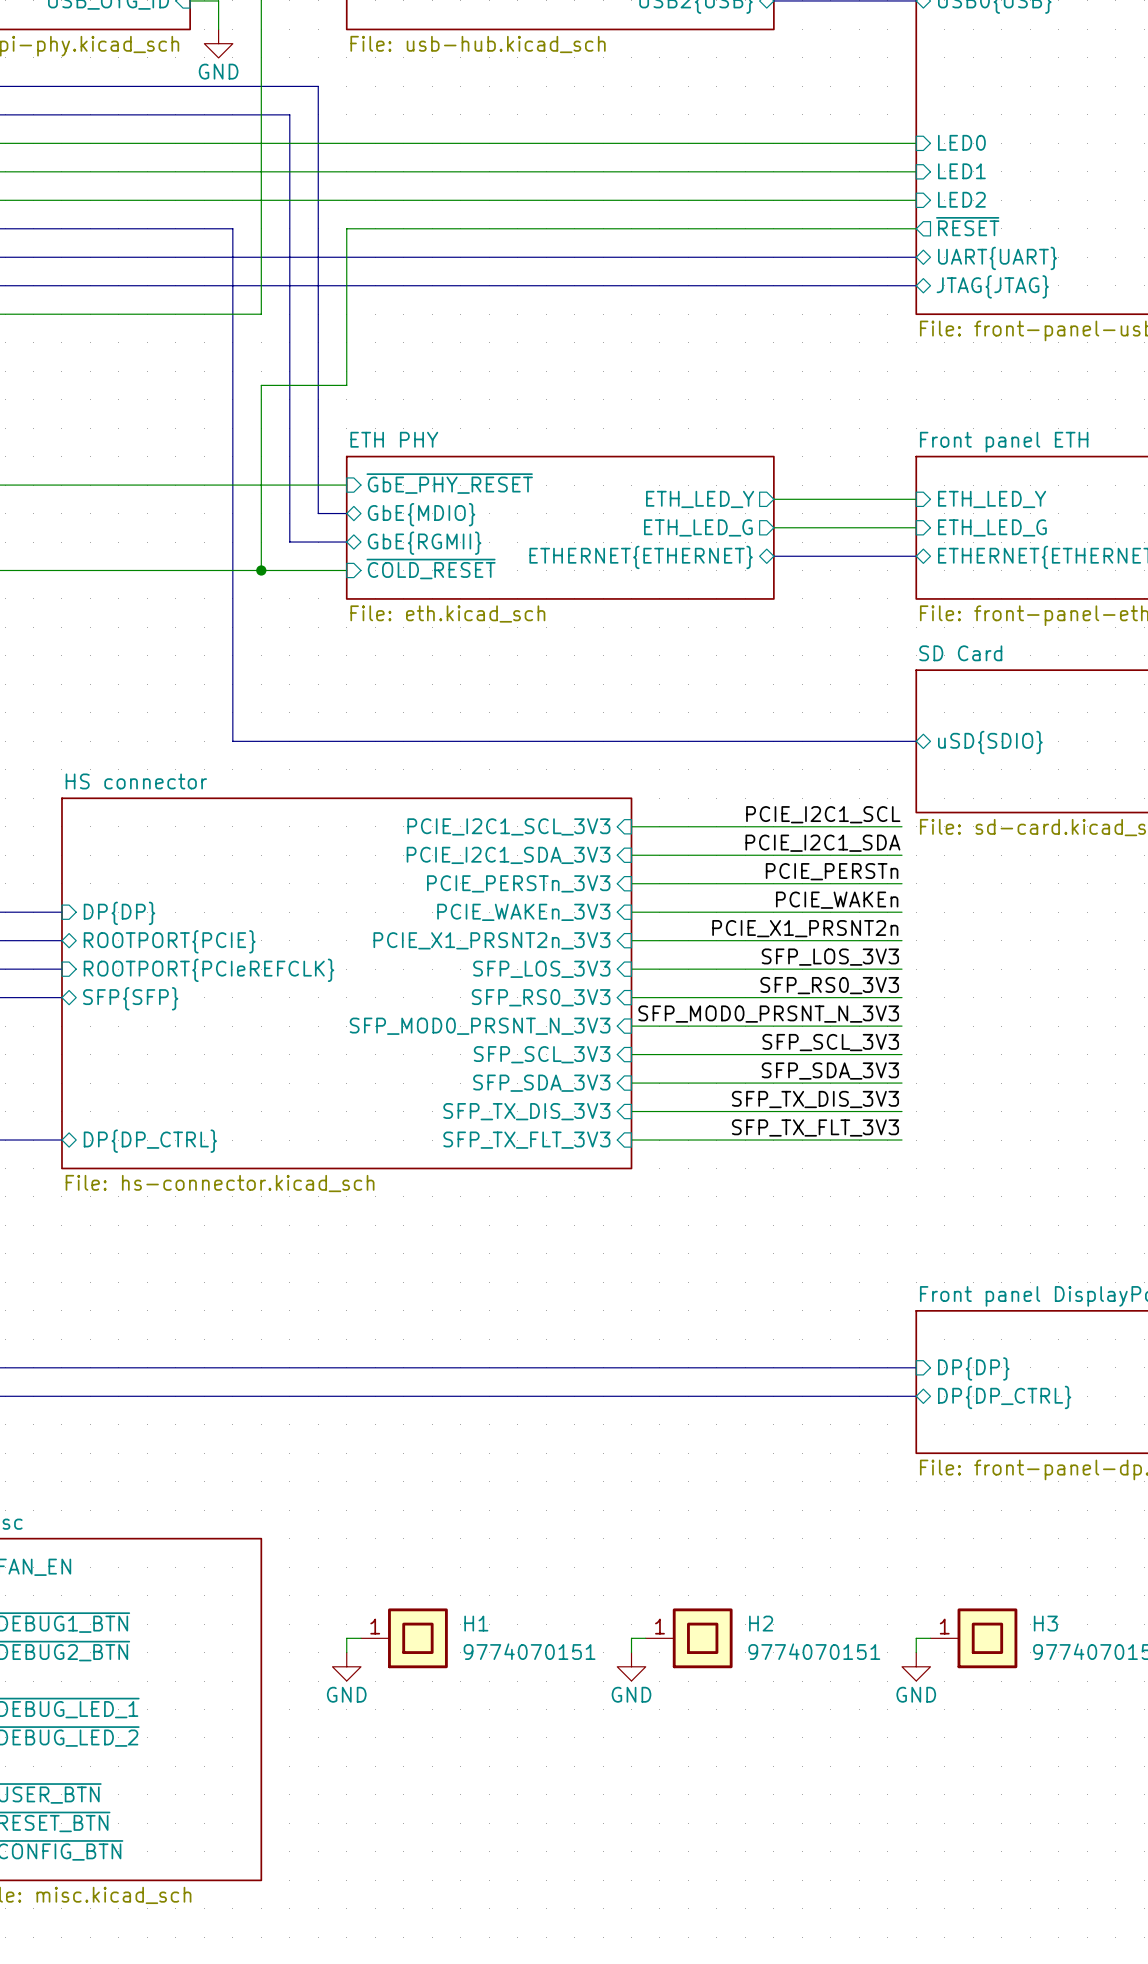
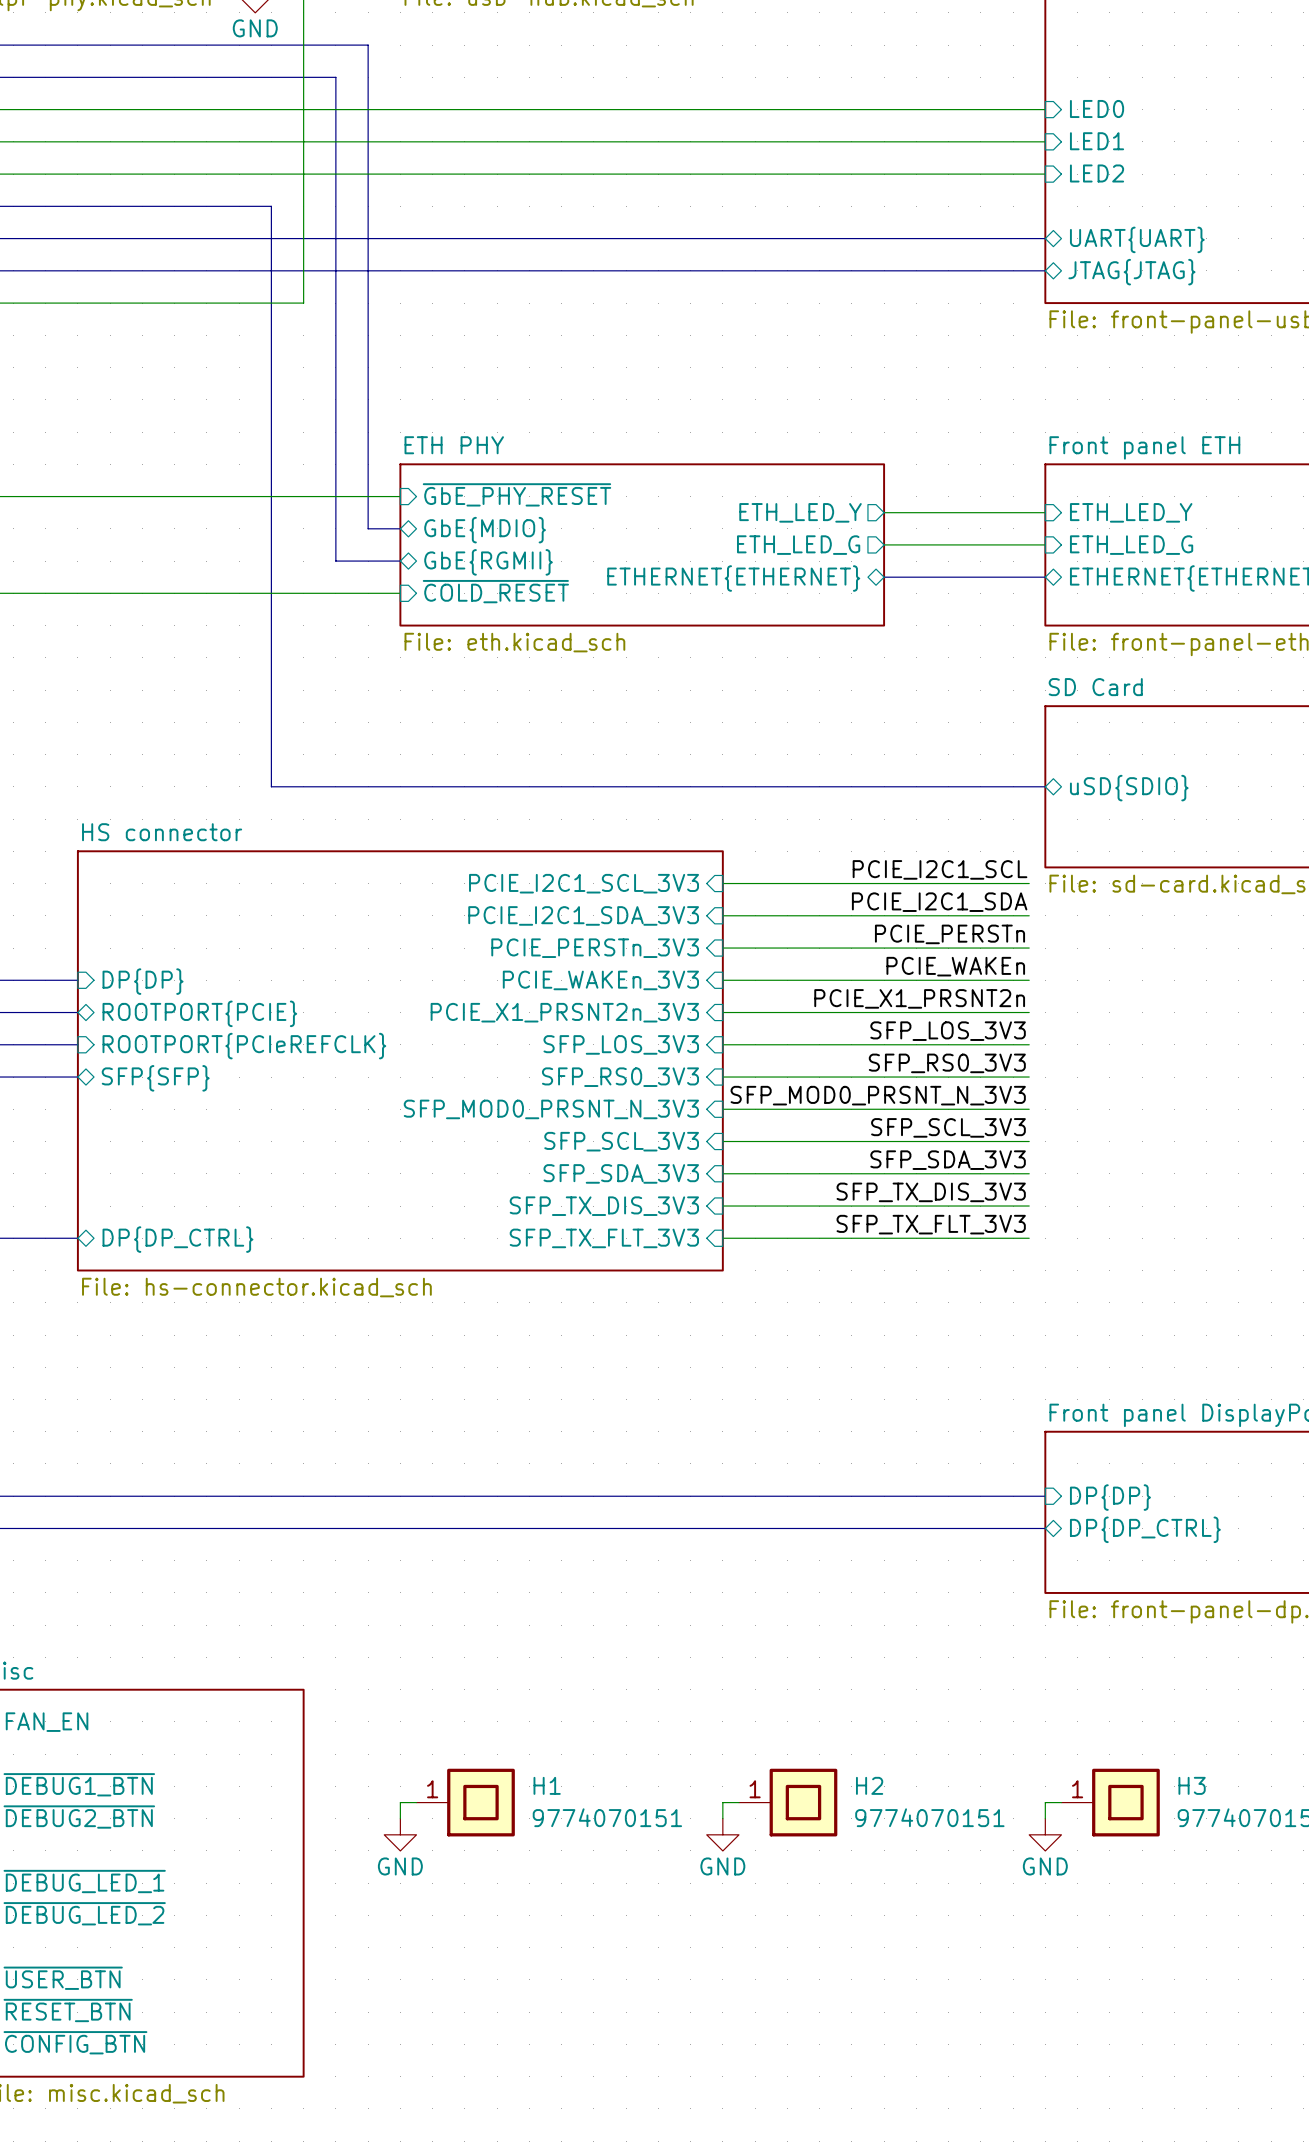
sheet pin: ~{RESET} (967, 226) -> none
wire: (916, 228) (346, 228) (346, 385) (261, 385) (261, 570) -> none
junction: (261, 570) -> none

